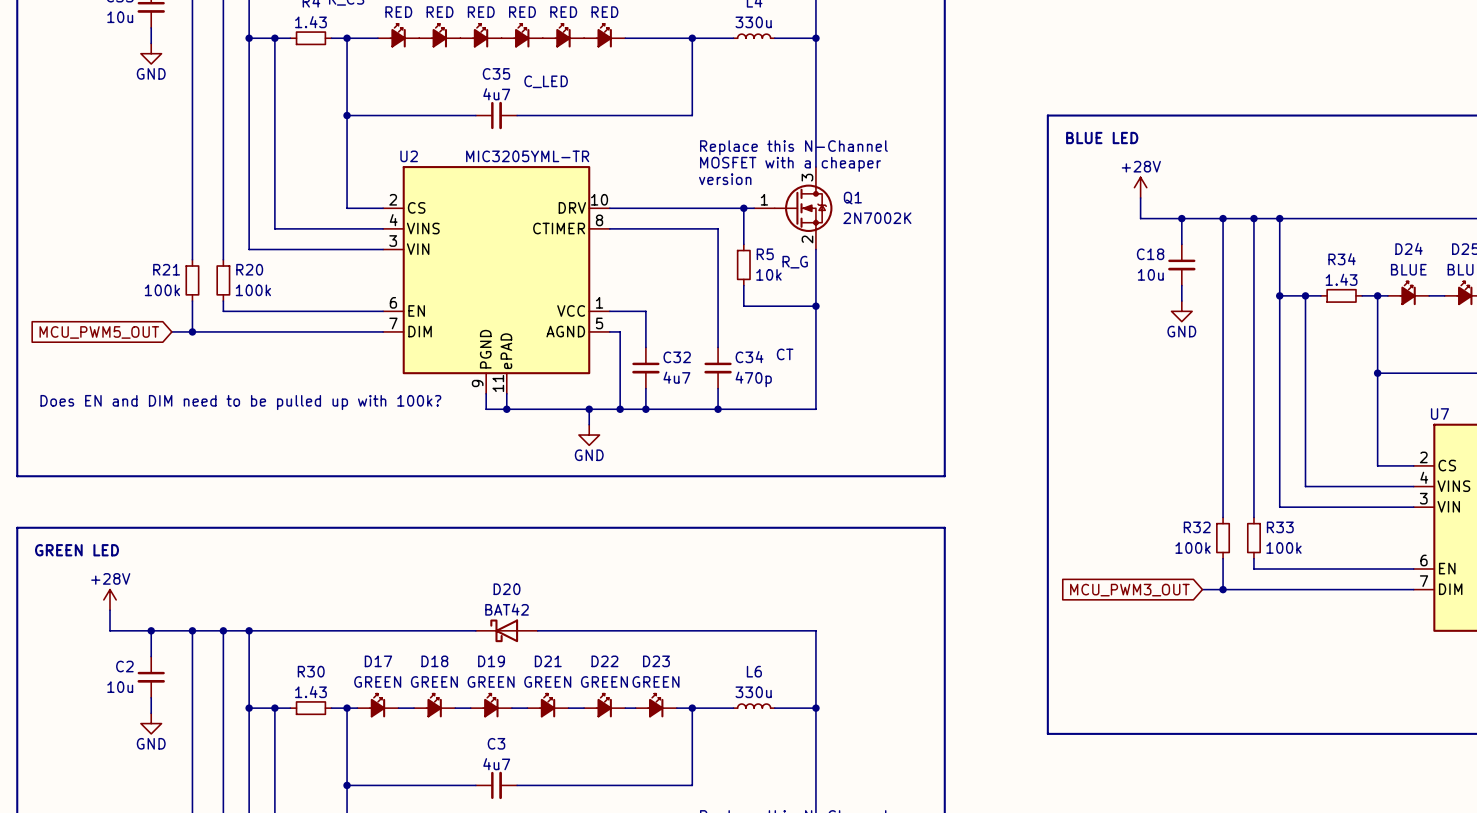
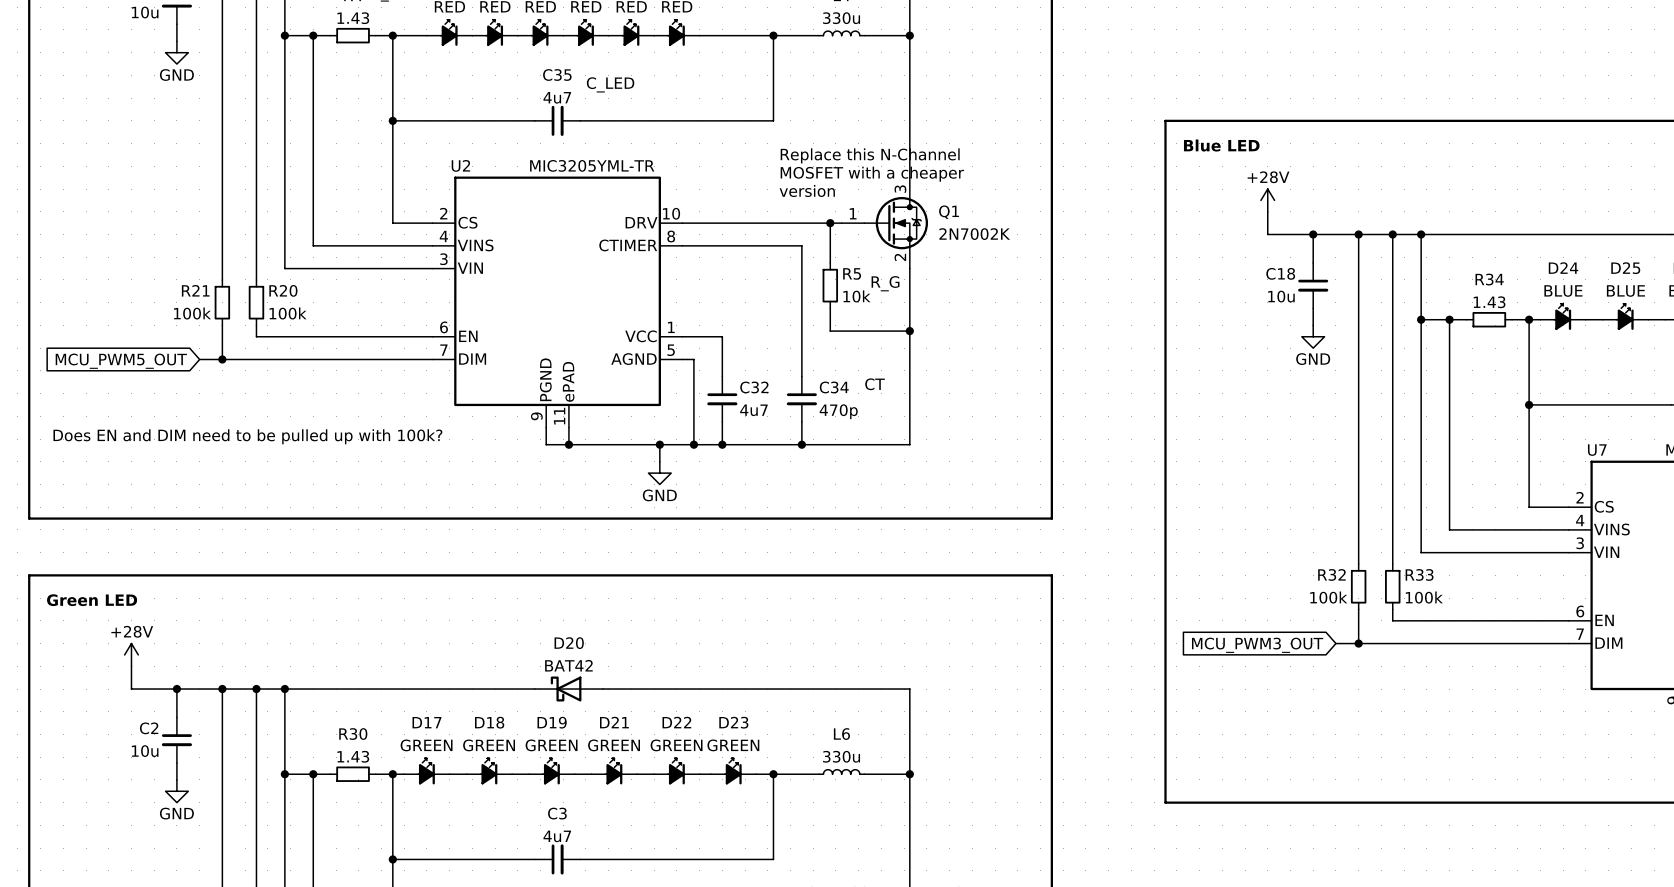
text: BLUE LED (1102, 138) -> Blue LED (1221, 145)
text: GREEN LED (77, 550) -> Green LED (92, 600)

